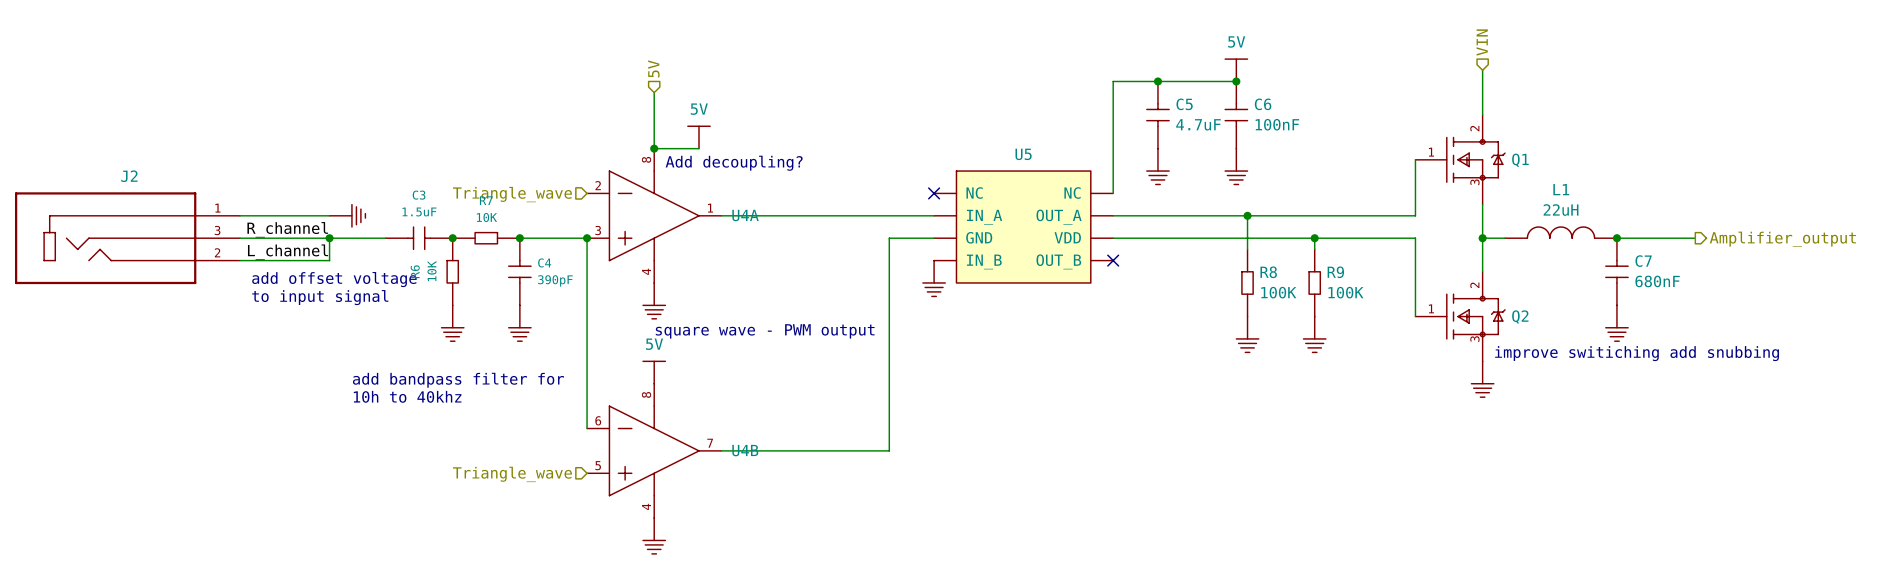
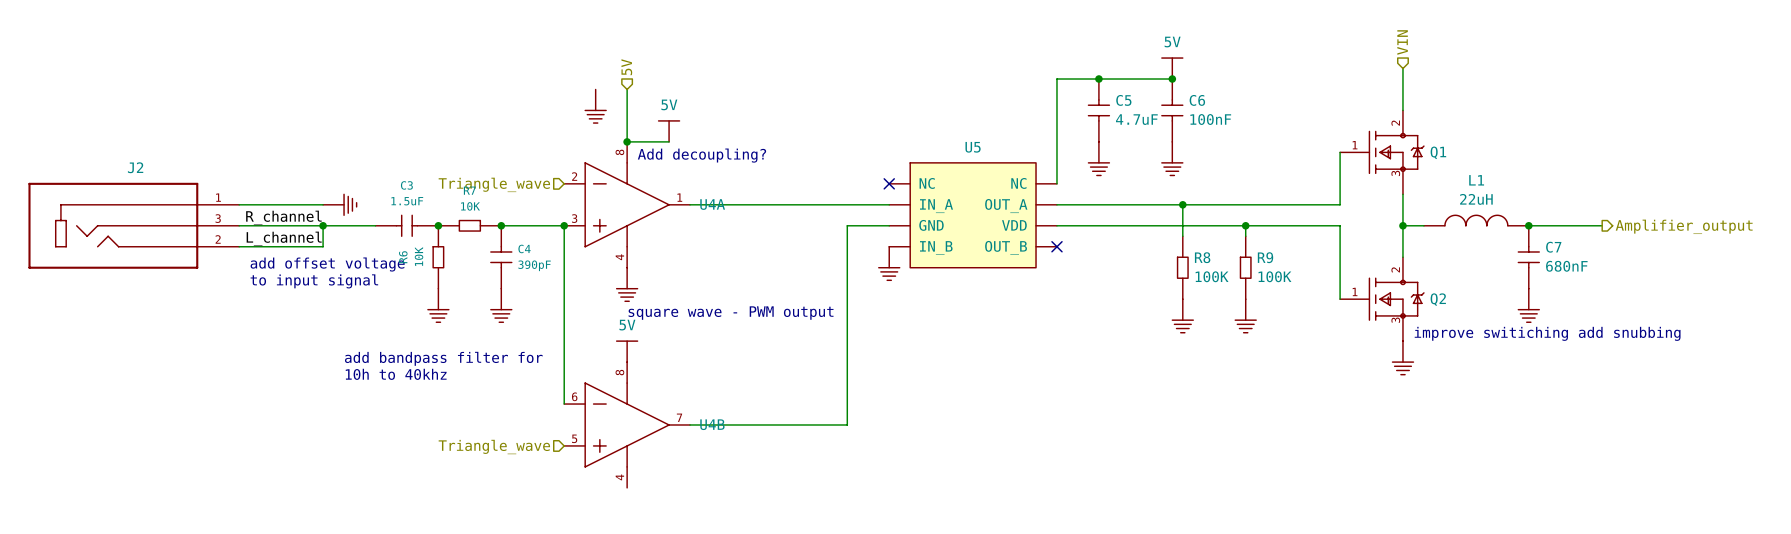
power symbol: none -> (595, 106)
power symbol: (654, 535) -> none

